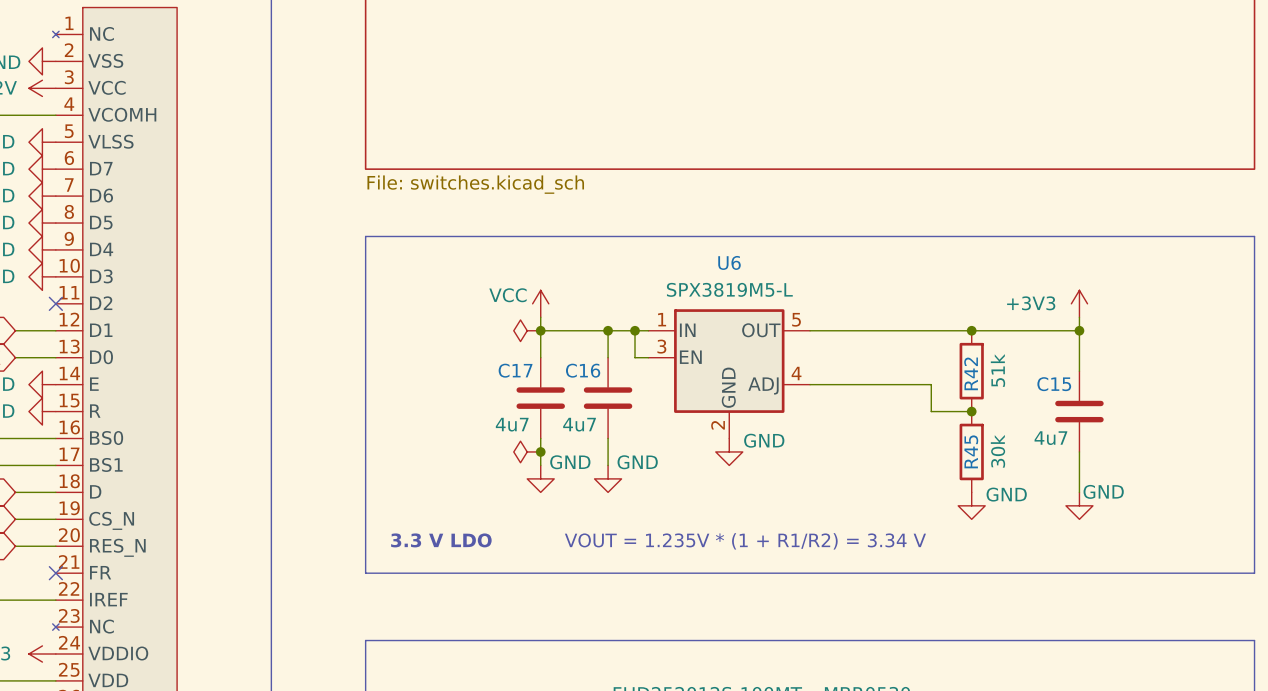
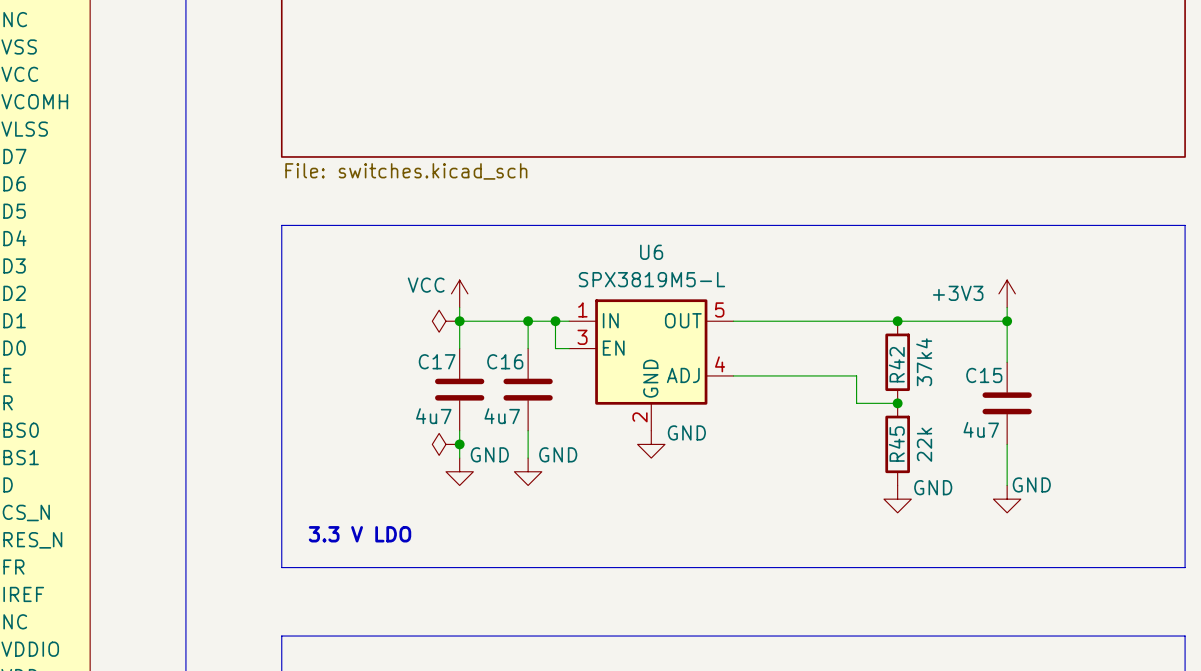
R42 value: 51k (997, 370) -> 37k4 (924, 362)
R45 value: 30k (997, 451) -> 22k (924, 444)
text: VOUT = 1.235V * (1 + R1/R2) = 3.34 V (745, 541) -> none

